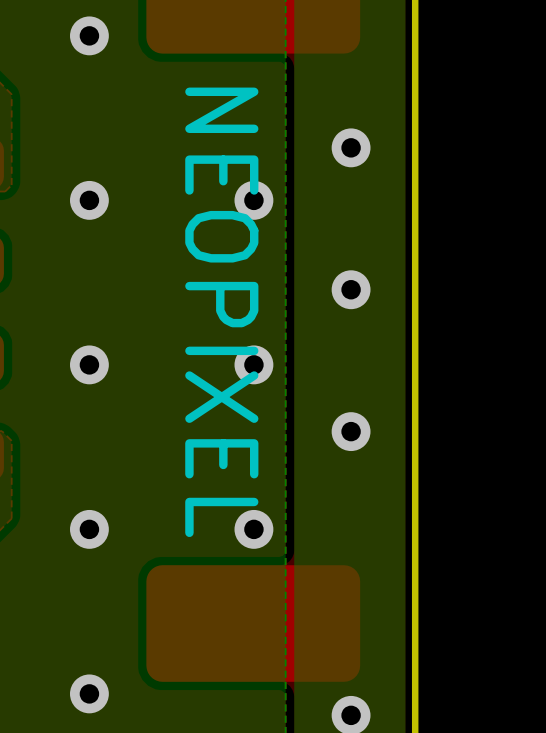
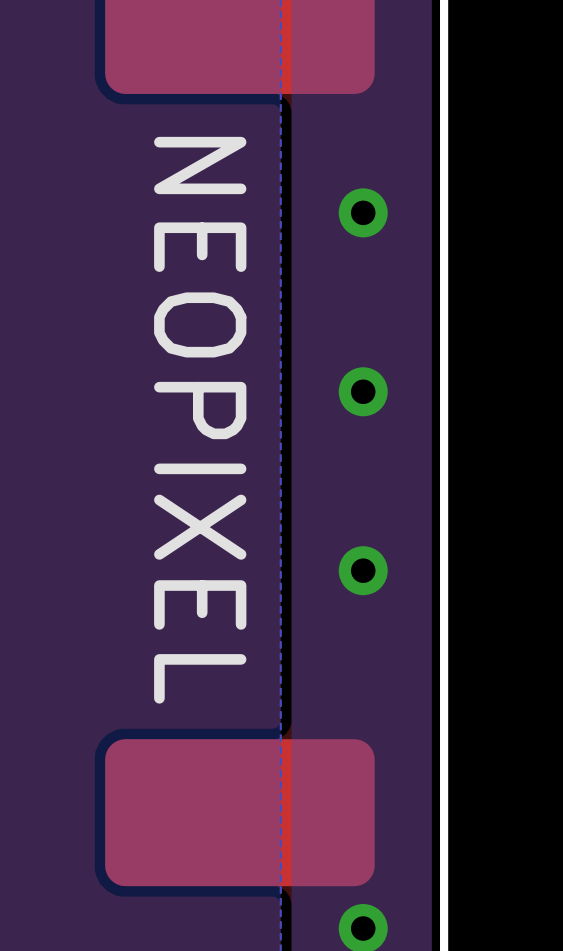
via: (89, 35) -> none
via: (89, 200) -> none
via: (253, 200) -> none
via: (89, 364) -> none
via: (253, 364) -> none
via: (89, 529) -> none
via: (253, 529) -> none
via: (89, 693) -> none

